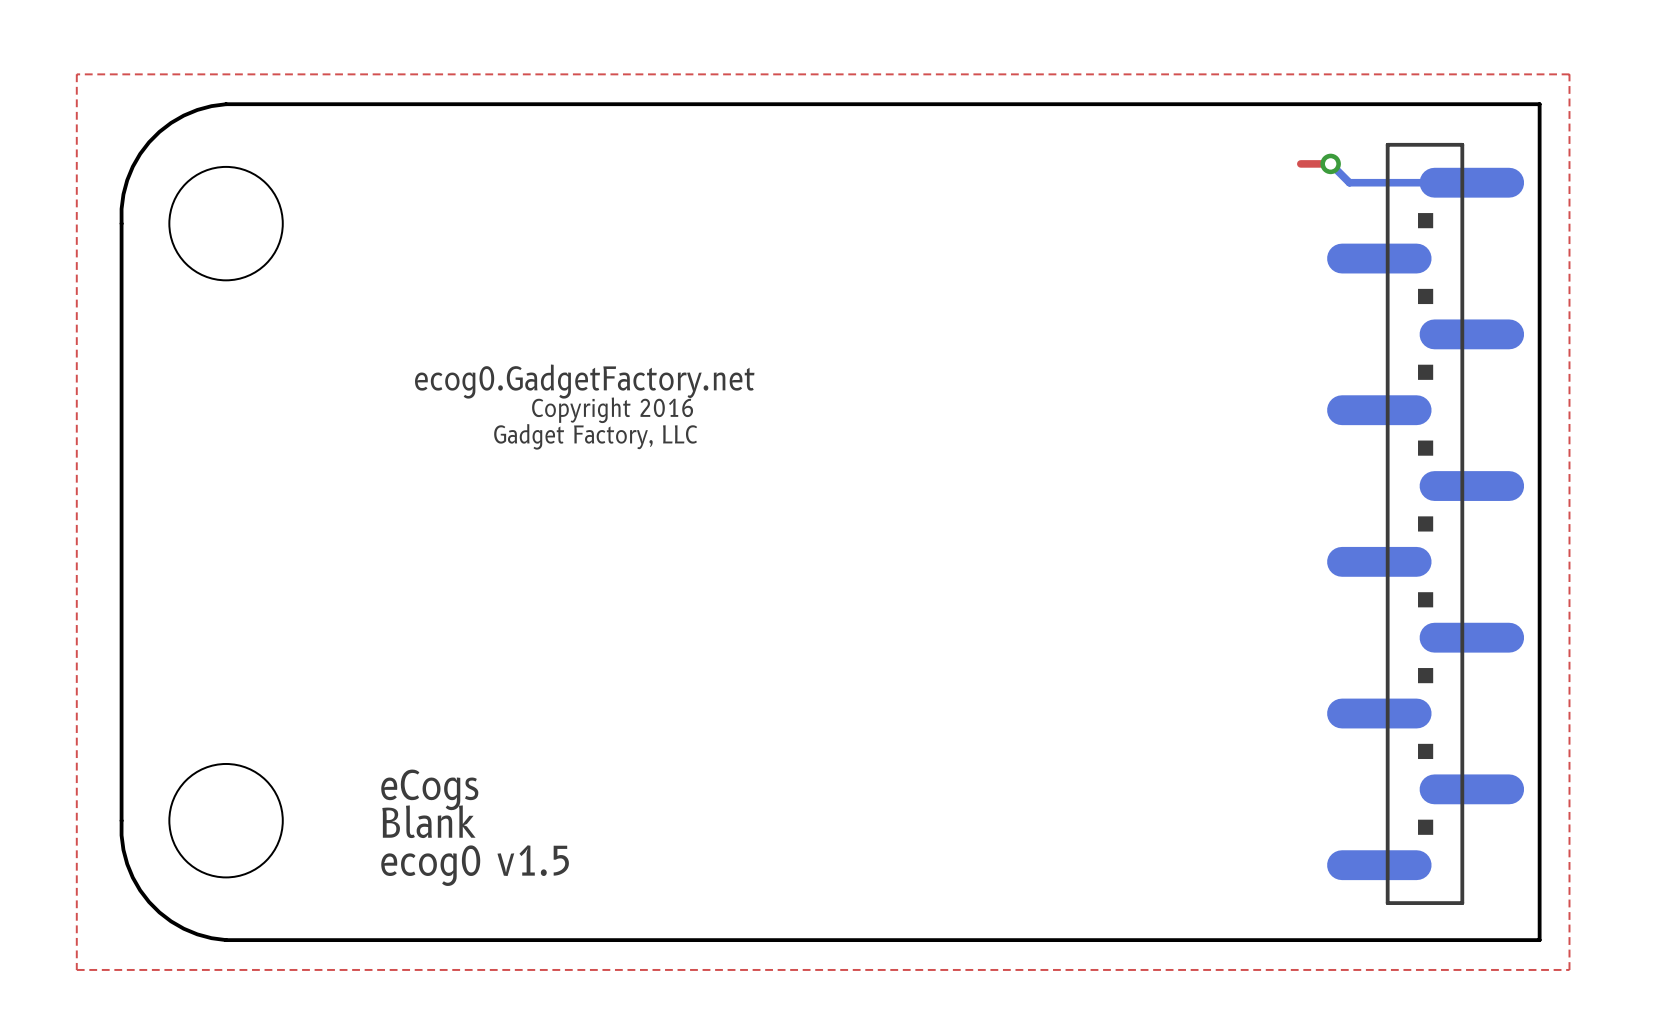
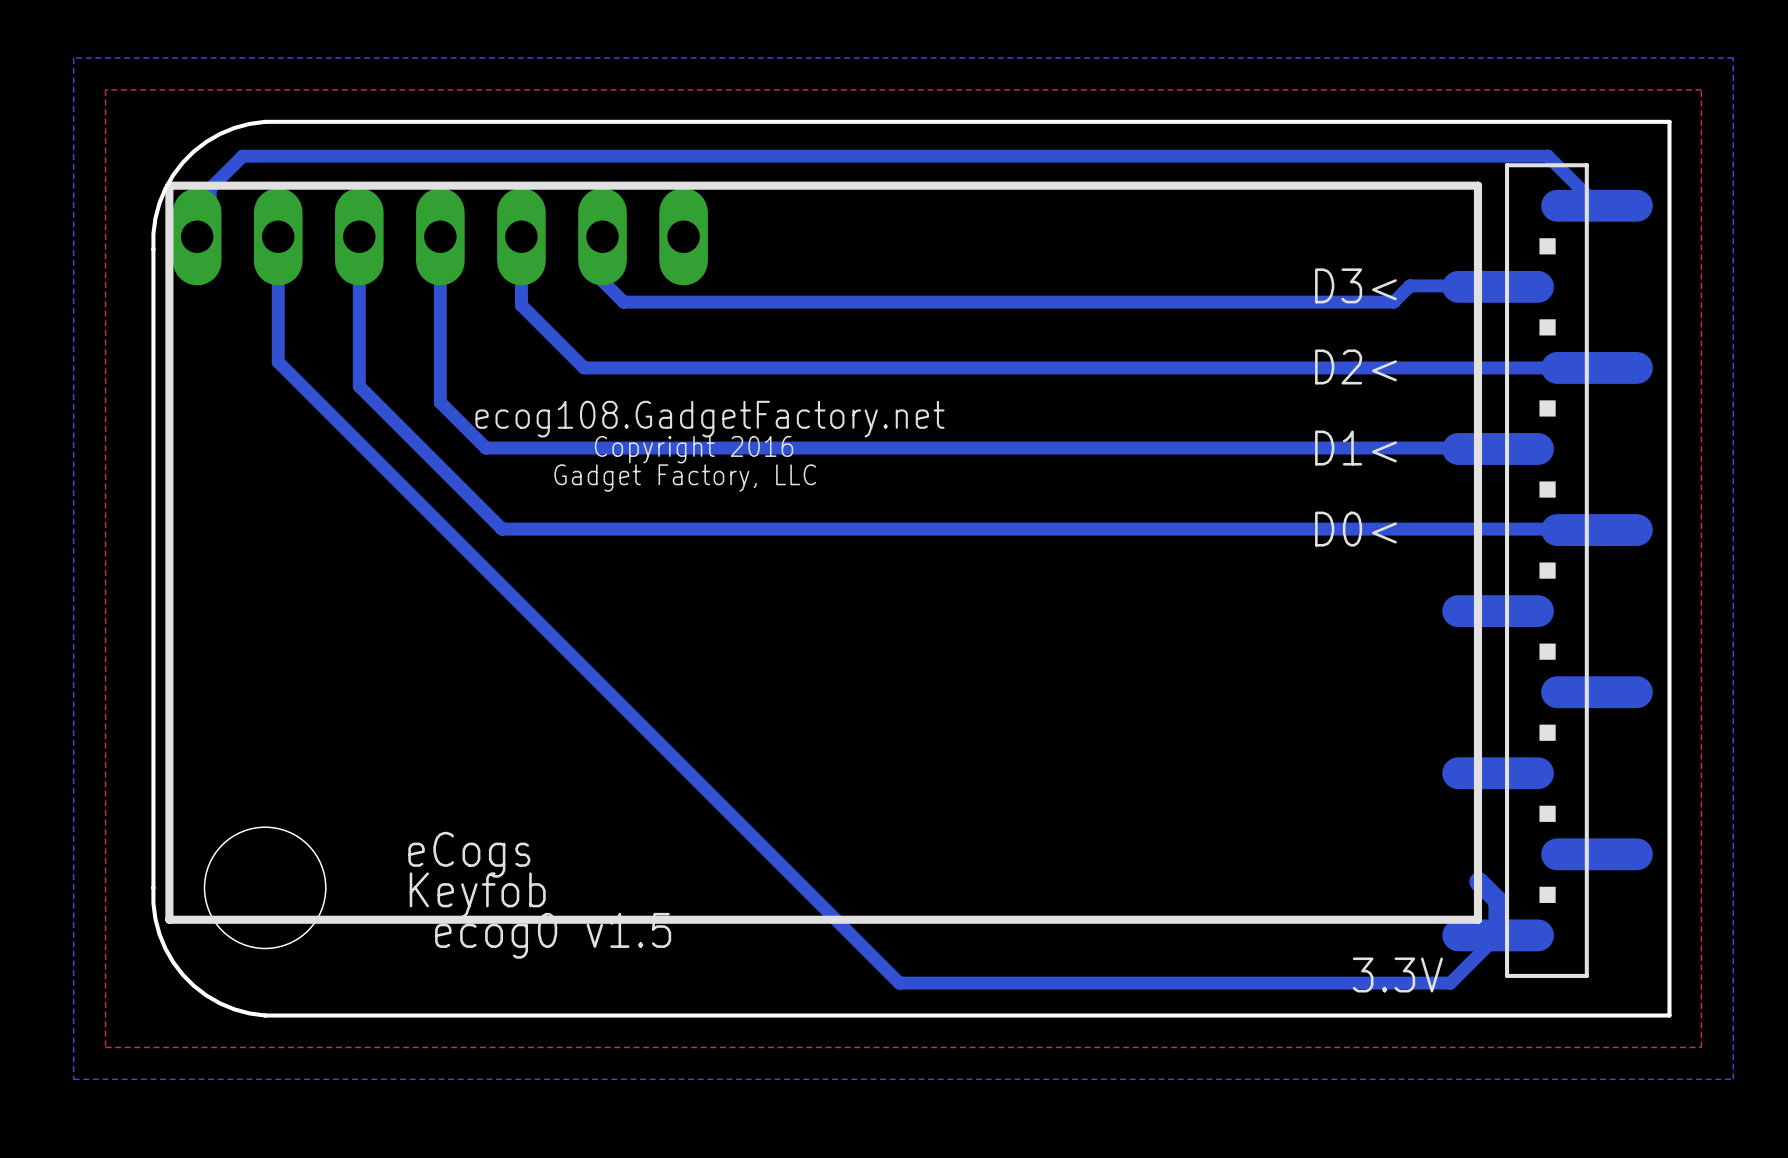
bottom zone outline: none -> (1733, 58) (73, 58) (73, 1079) (1733, 1079) (1733, 58)
part footprint: [119, 102, 1542, 943] -> [151, 119, 1672, 1018]
bottom track: (1330, 163) (1349, 182) (1471, 182) -> (197, 236) (210, 223) (210, 188) (242, 156) (1547, 156) (1597, 205)
top track: (1330, 163) (1300, 163) -> none
via: (1330, 163) -> none
line: none -> (1477, 185) (169, 185) (169, 919) (1477, 919) (1477, 185)
bottom track: none -> (278, 236) (278, 361) (899, 983) (1450, 983) (1498, 935) (1498, 900) (1478, 881)
bottom track: none -> (359, 236) (359, 386) (502, 529) (1597, 530)
bottom track: none -> (440, 236) (440, 402) (485, 448) (1498, 448)
part: none -> (440, 236)
bottom track: none -> (521, 236) (521, 305) (584, 367) (1597, 367)
bottom track: none -> (602, 236) (602, 280) (623, 302) (1393, 302) (1410, 285) (1498, 286)
text: none -> D3< (1355, 285)
text: none -> D2< (1355, 366)
text: ecog0.GadgetFactory.net (584, 381) -> ecog108.GadgetFactory.net (710, 419)
text: none -> D1< (1355, 448)
text: none -> D0< (1355, 529)
text position: eCogs (429, 789) -> eCogs (469, 854)
text: Blank (428, 821) -> Keyfob (477, 895)
text: none -> 3.3V (1397, 974)

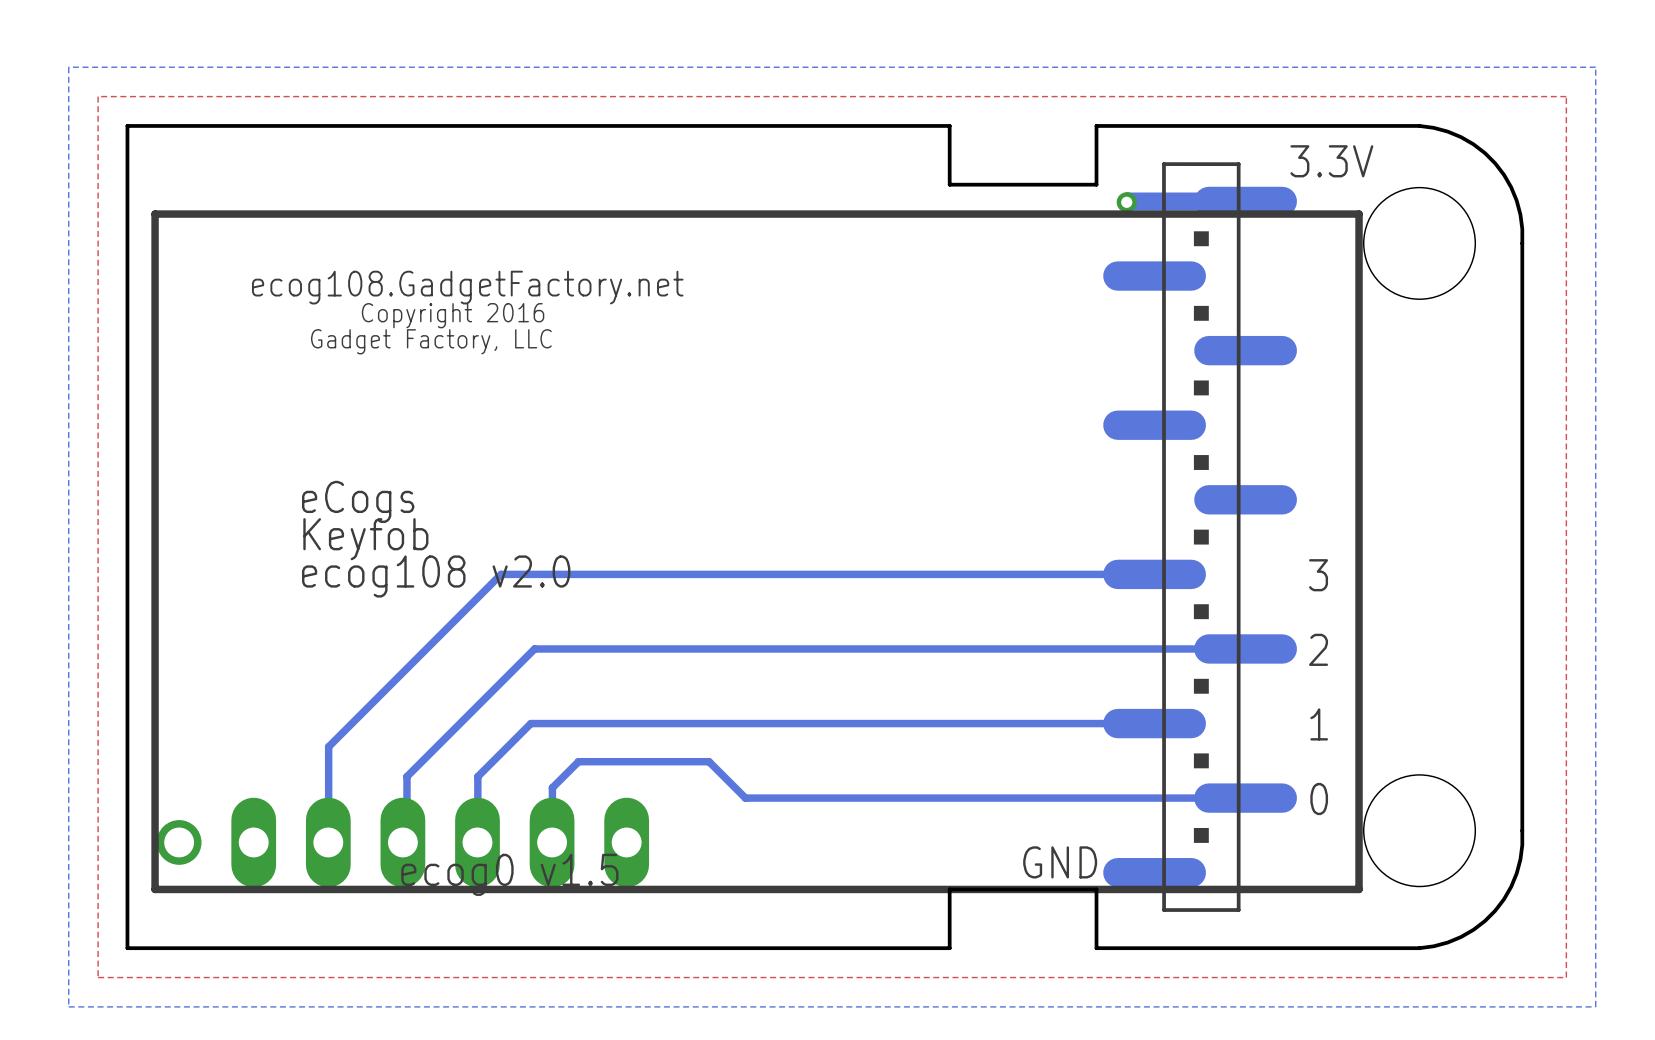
part footprint: [151, 119, 1672, 1018] -> [125, 124, 1525, 951]
text: none -> 3.3V (1331, 161)
line: (1477, 185) (169, 185) (169, 919) (1477, 919) (1477, 185) -> (1359, 214) (155, 214) (155, 889) (1359, 889) (1359, 214)
bottom track: none -> (1245, 201) (1126, 202)
via: none -> (1126, 202)
bottom track: (1597, 205) (1547, 156) (242, 156) (210, 188) (210, 223) (197, 236) -> none
bottom track: (278, 236) (278, 361) (899, 983) (1450, 983) (1498, 935) (1498, 900) (1478, 881) -> none
bottom track: (359, 236) (359, 386) (502, 529) (1597, 530) -> none
bottom track: (440, 236) (440, 402) (485, 448) (1498, 448) -> none
part: (440, 236) -> none
bottom track: (521, 236) (521, 305) (584, 367) (1597, 367) -> none
bottom track: (602, 236) (602, 280) (623, 302) (1393, 302) (1410, 285) (1498, 286) -> none
text: D3< (1355, 285) -> none
text: D2< (1355, 366) -> none
text position: ecog108.GadgetFactory.net (710, 419) -> ecog108.GadgetFactory.net (467, 287)
text: D1< (1355, 448) -> none
text position: Copyright 2016 (694, 449) -> Copyright 2016 (453, 315)
text position: Gadget Factory, LLC (685, 478) -> Gadget Factory, LLC (431, 341)
text: D0< (1355, 529) -> none
bottom track: none -> (1154, 574) (501, 574) (328, 746) (328, 842)
text: none -> 3 (1318, 575)
text: none -> ecog108 v2.0 (436, 576)
bottom track: none -> (1245, 648) (534, 648) (406, 776) (406, 838) (402, 842)
text: none -> 2 (1318, 649)
bottom track: none -> (1154, 723) (530, 723) (477, 776) (477, 842)
text: none -> 1 (1319, 724)
bottom track: none -> (1245, 798) (745, 798) (709, 761) (578, 761) (552, 787) (552, 842)
text: none -> 0 (1319, 799)
text position: eCogs (469, 854) -> eCogs (358, 501)
text position: Keyfob (477, 895) -> Keyfob (365, 539)
part: none -> (402, 842)
text: none -> GND (1060, 862)
text: 3.3V (1397, 974) -> none

